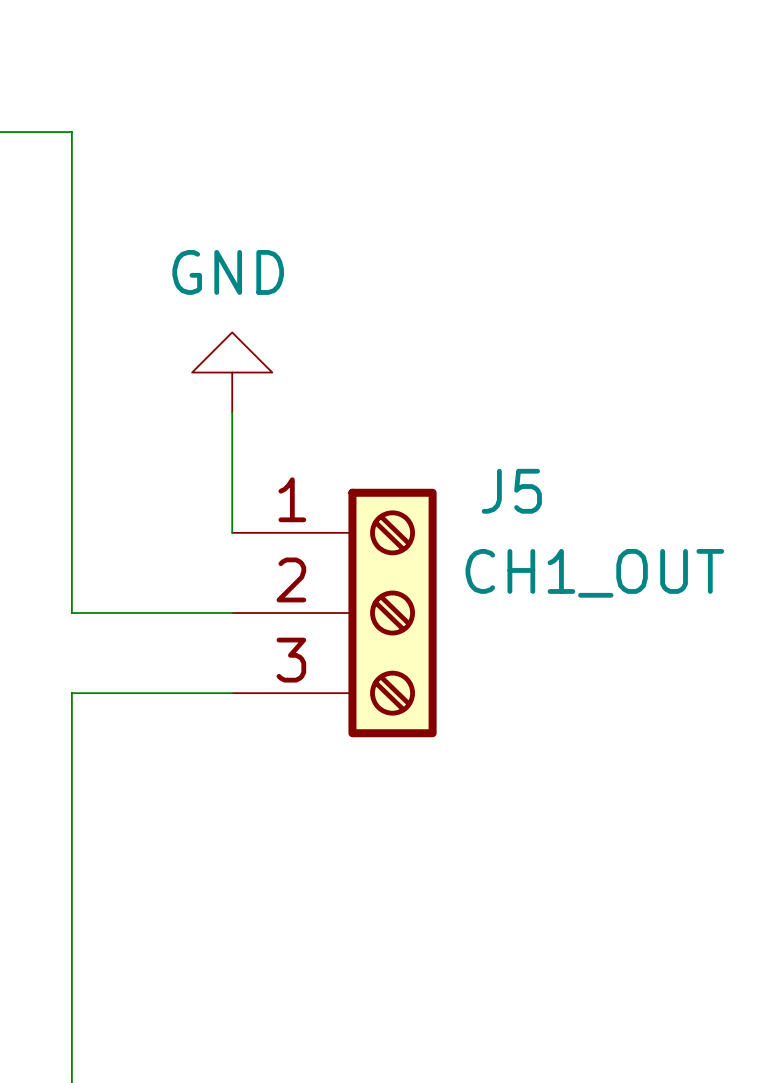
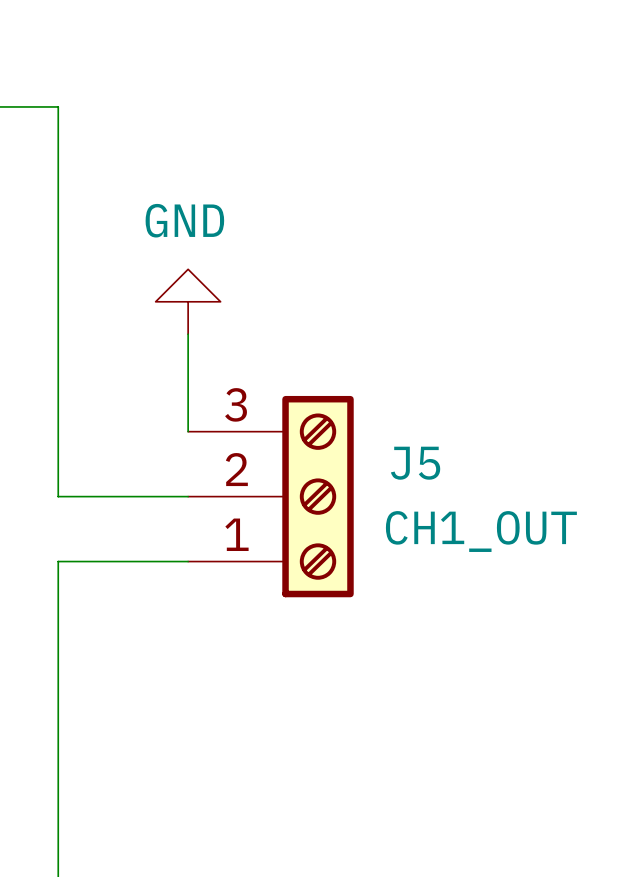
J5 name position: J5 (511, 491) -> J5 (415, 463)
J5 flip: as is (392, 613) -> up-down (318, 496)

